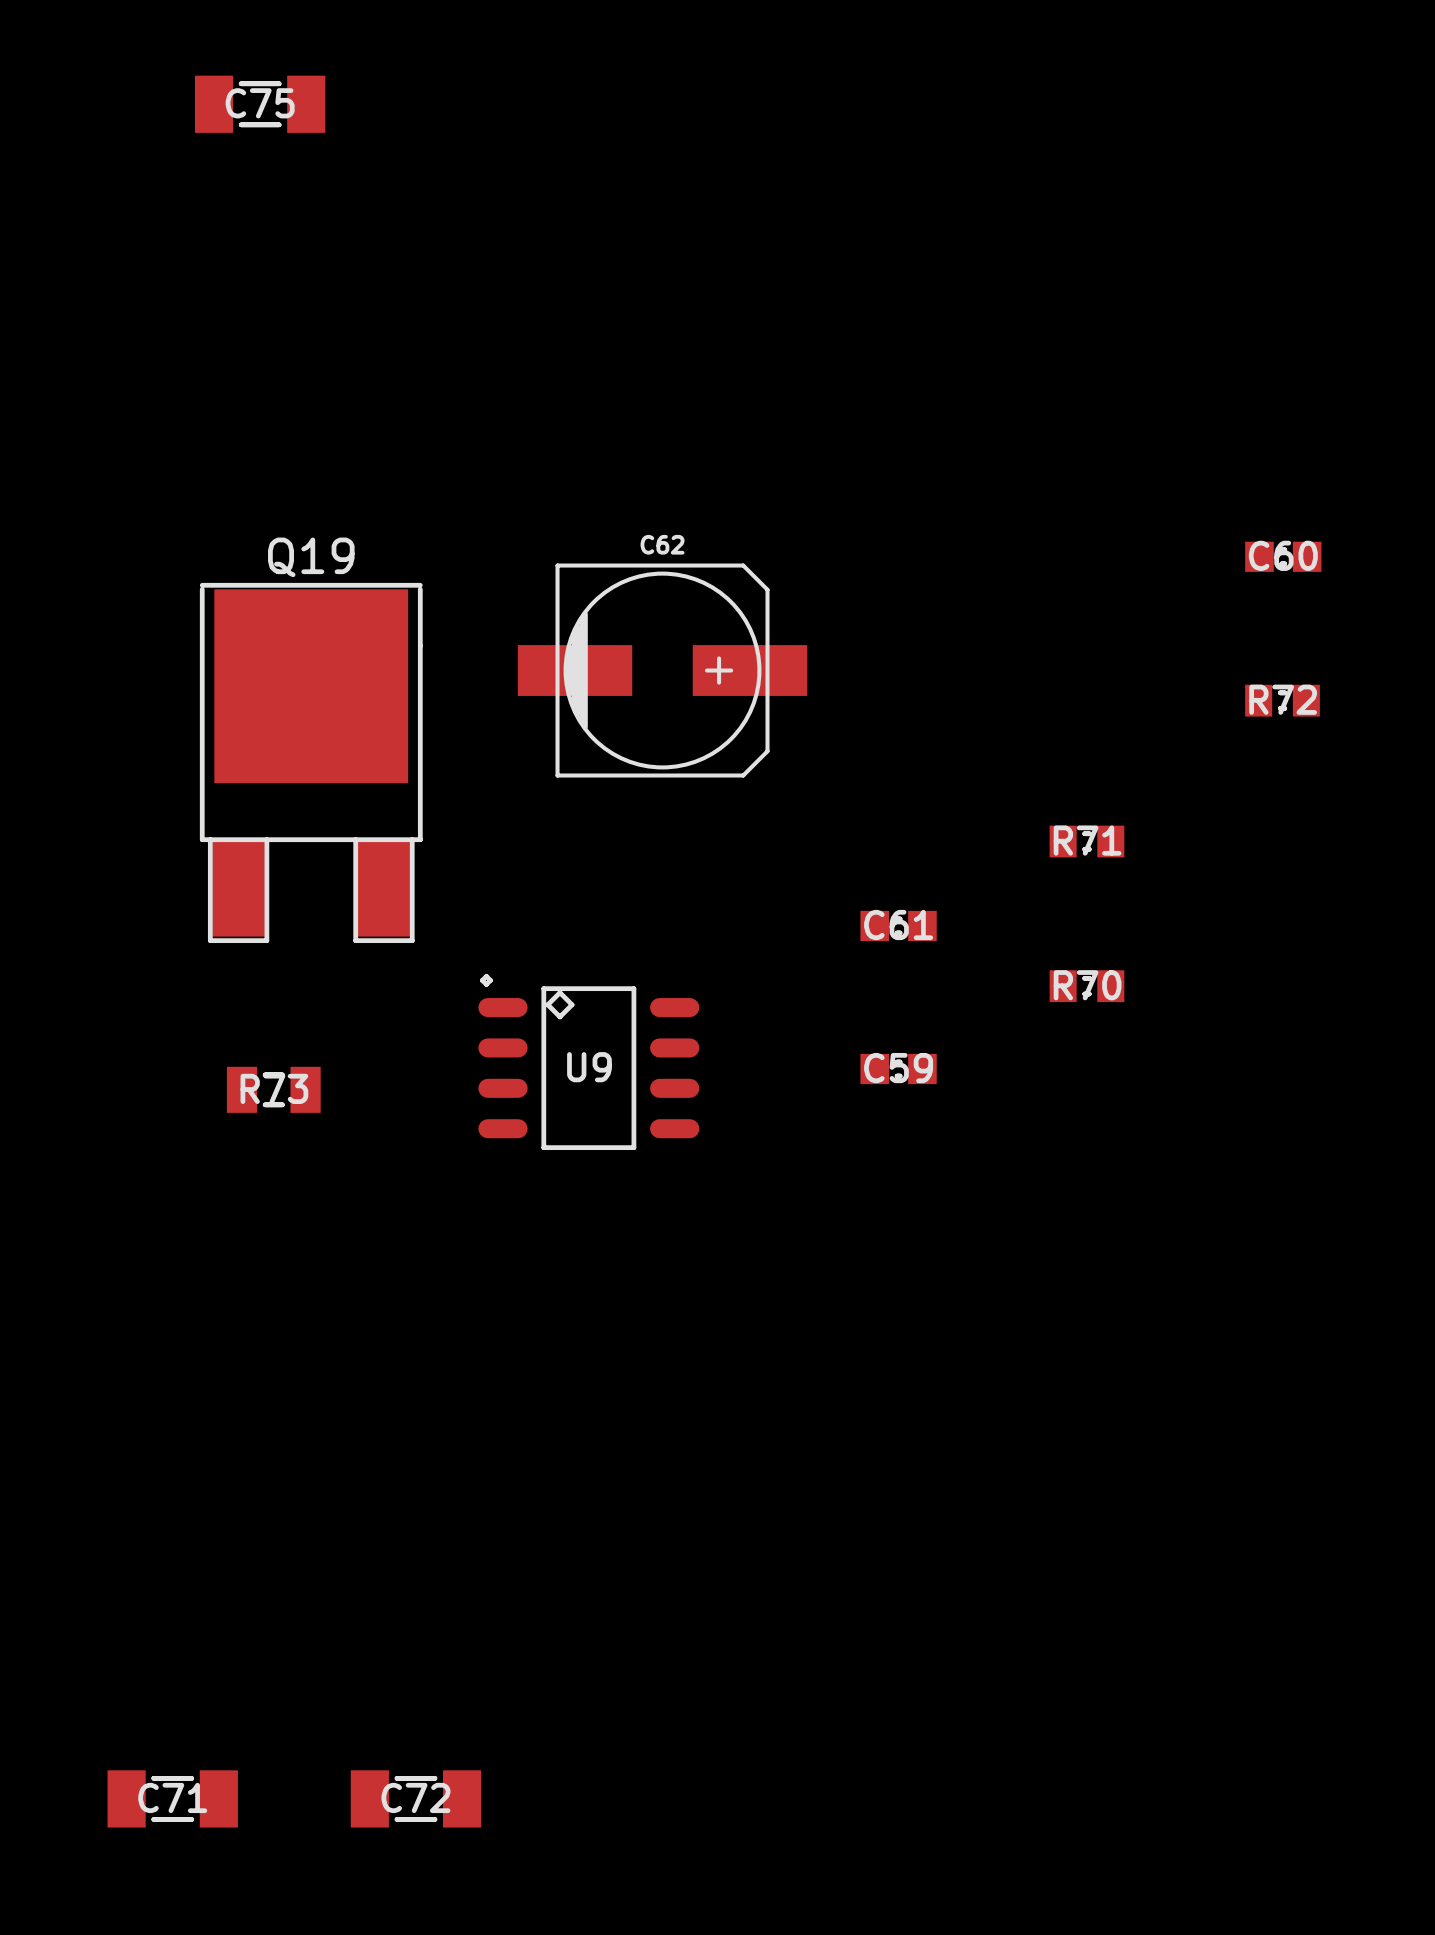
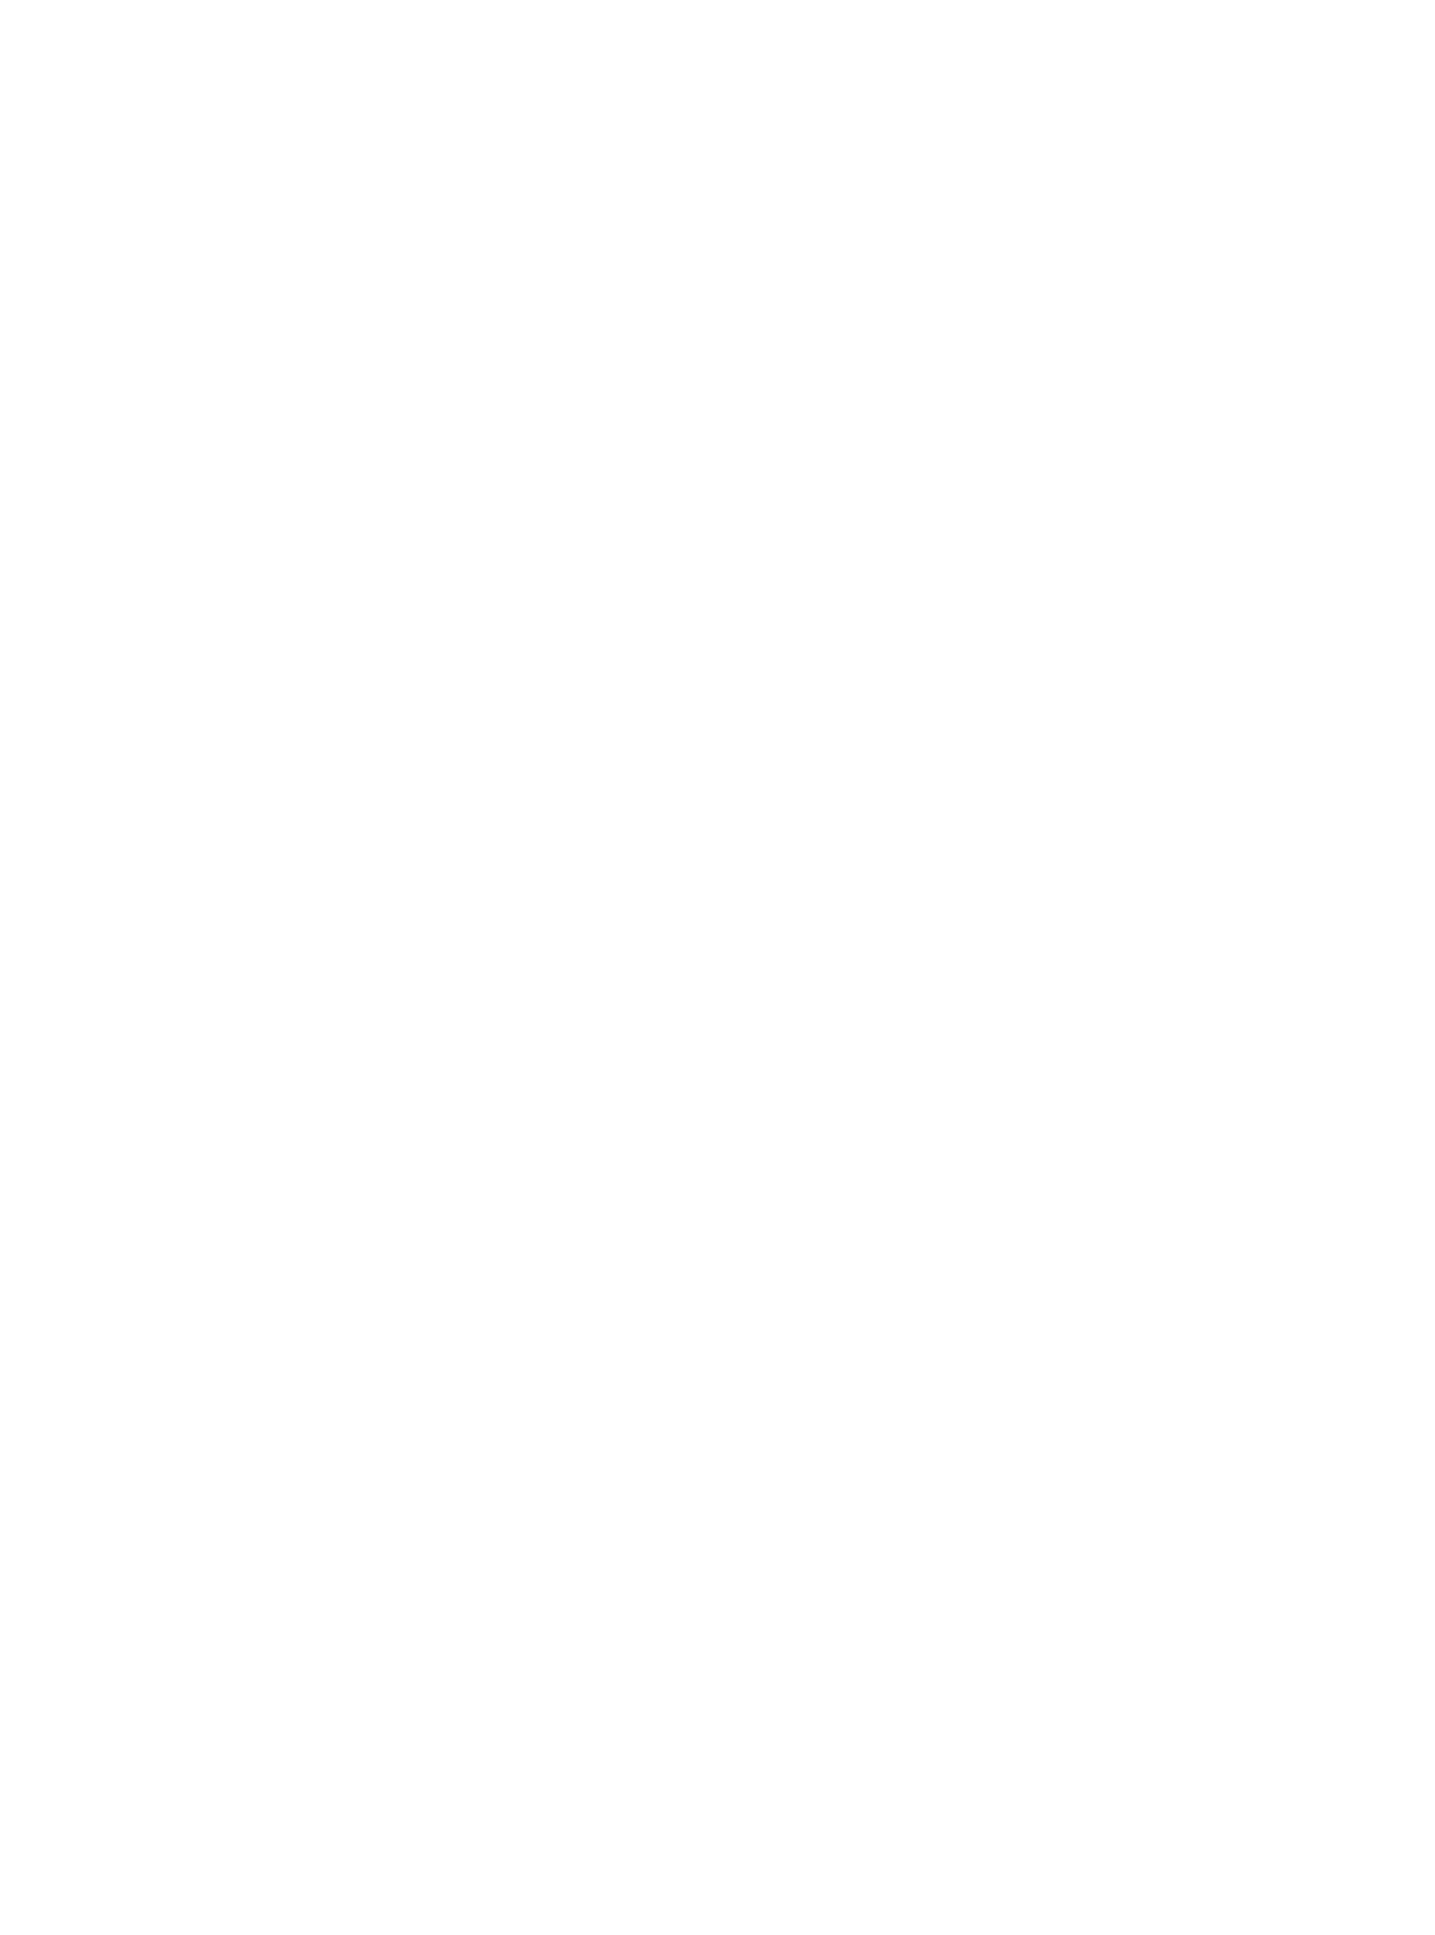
C75: (260, 104) -> none
C60: (1283, 556) -> none
C62: (662, 670) -> none
R72: (1282, 700) -> none
Q19: (311, 762) -> none
R71: (1086, 841) -> none
C61: (898, 925) -> none
R70: (1086, 986) -> none
U9: (588, 1062) -> none
C59: (898, 1069) -> none
R73: (273, 1089) -> none
C71: (172, 1798) -> none
C72: (415, 1798) -> none

